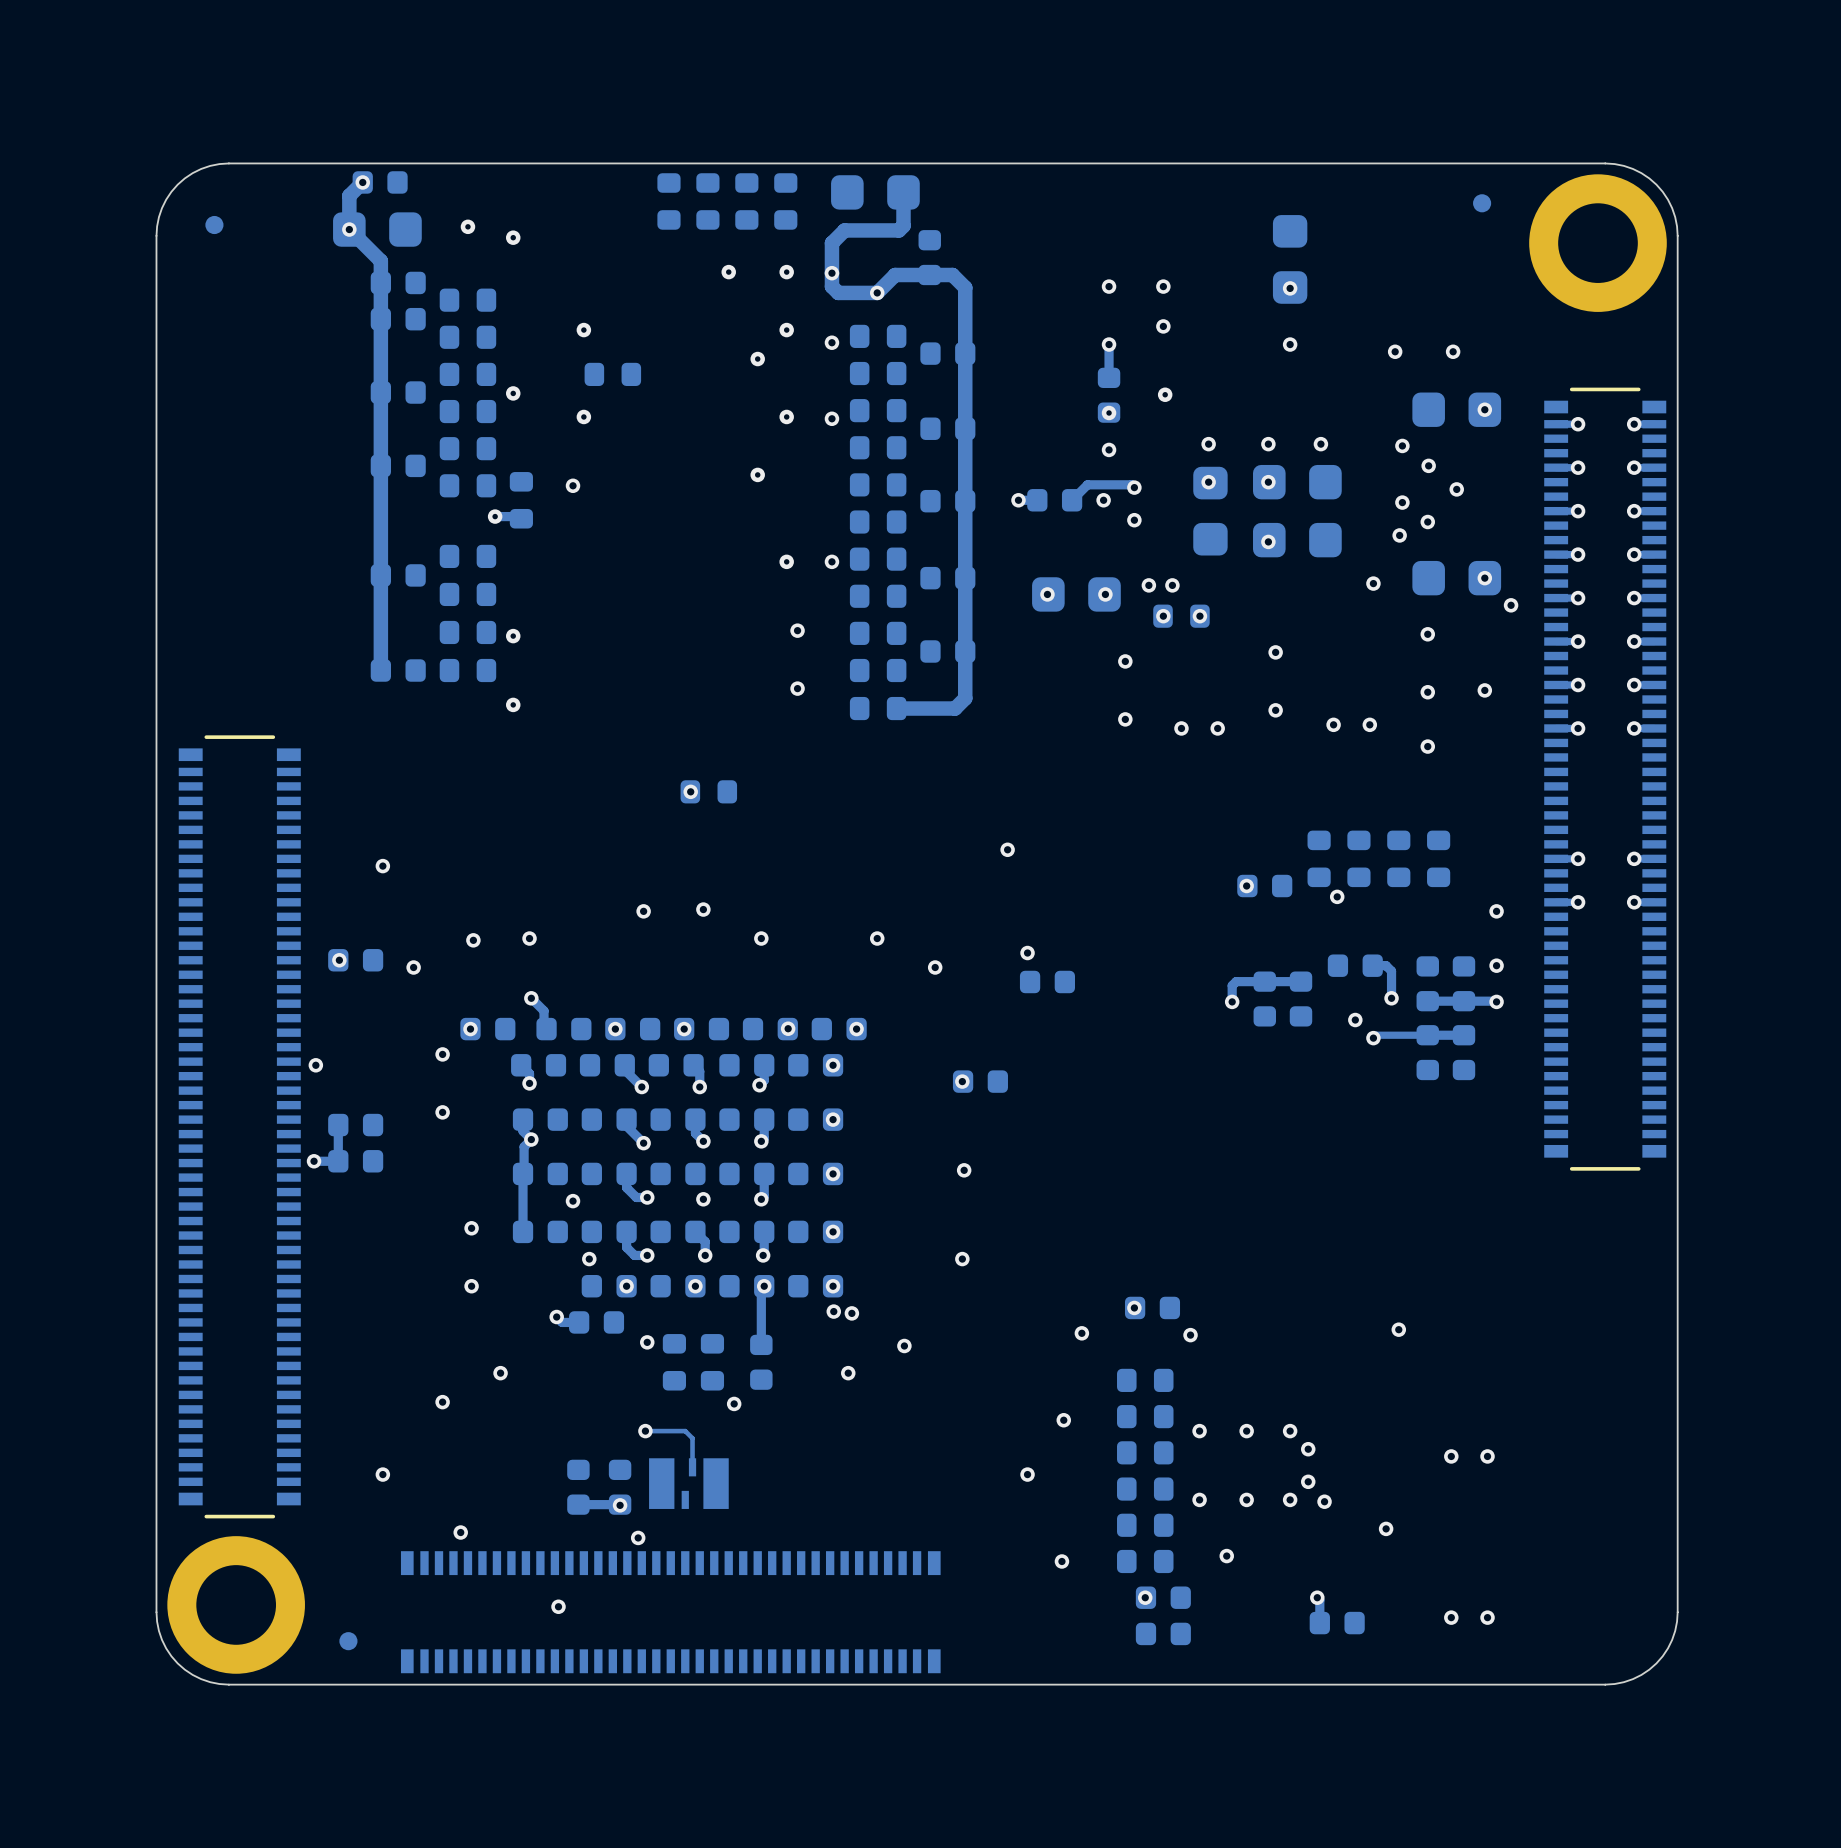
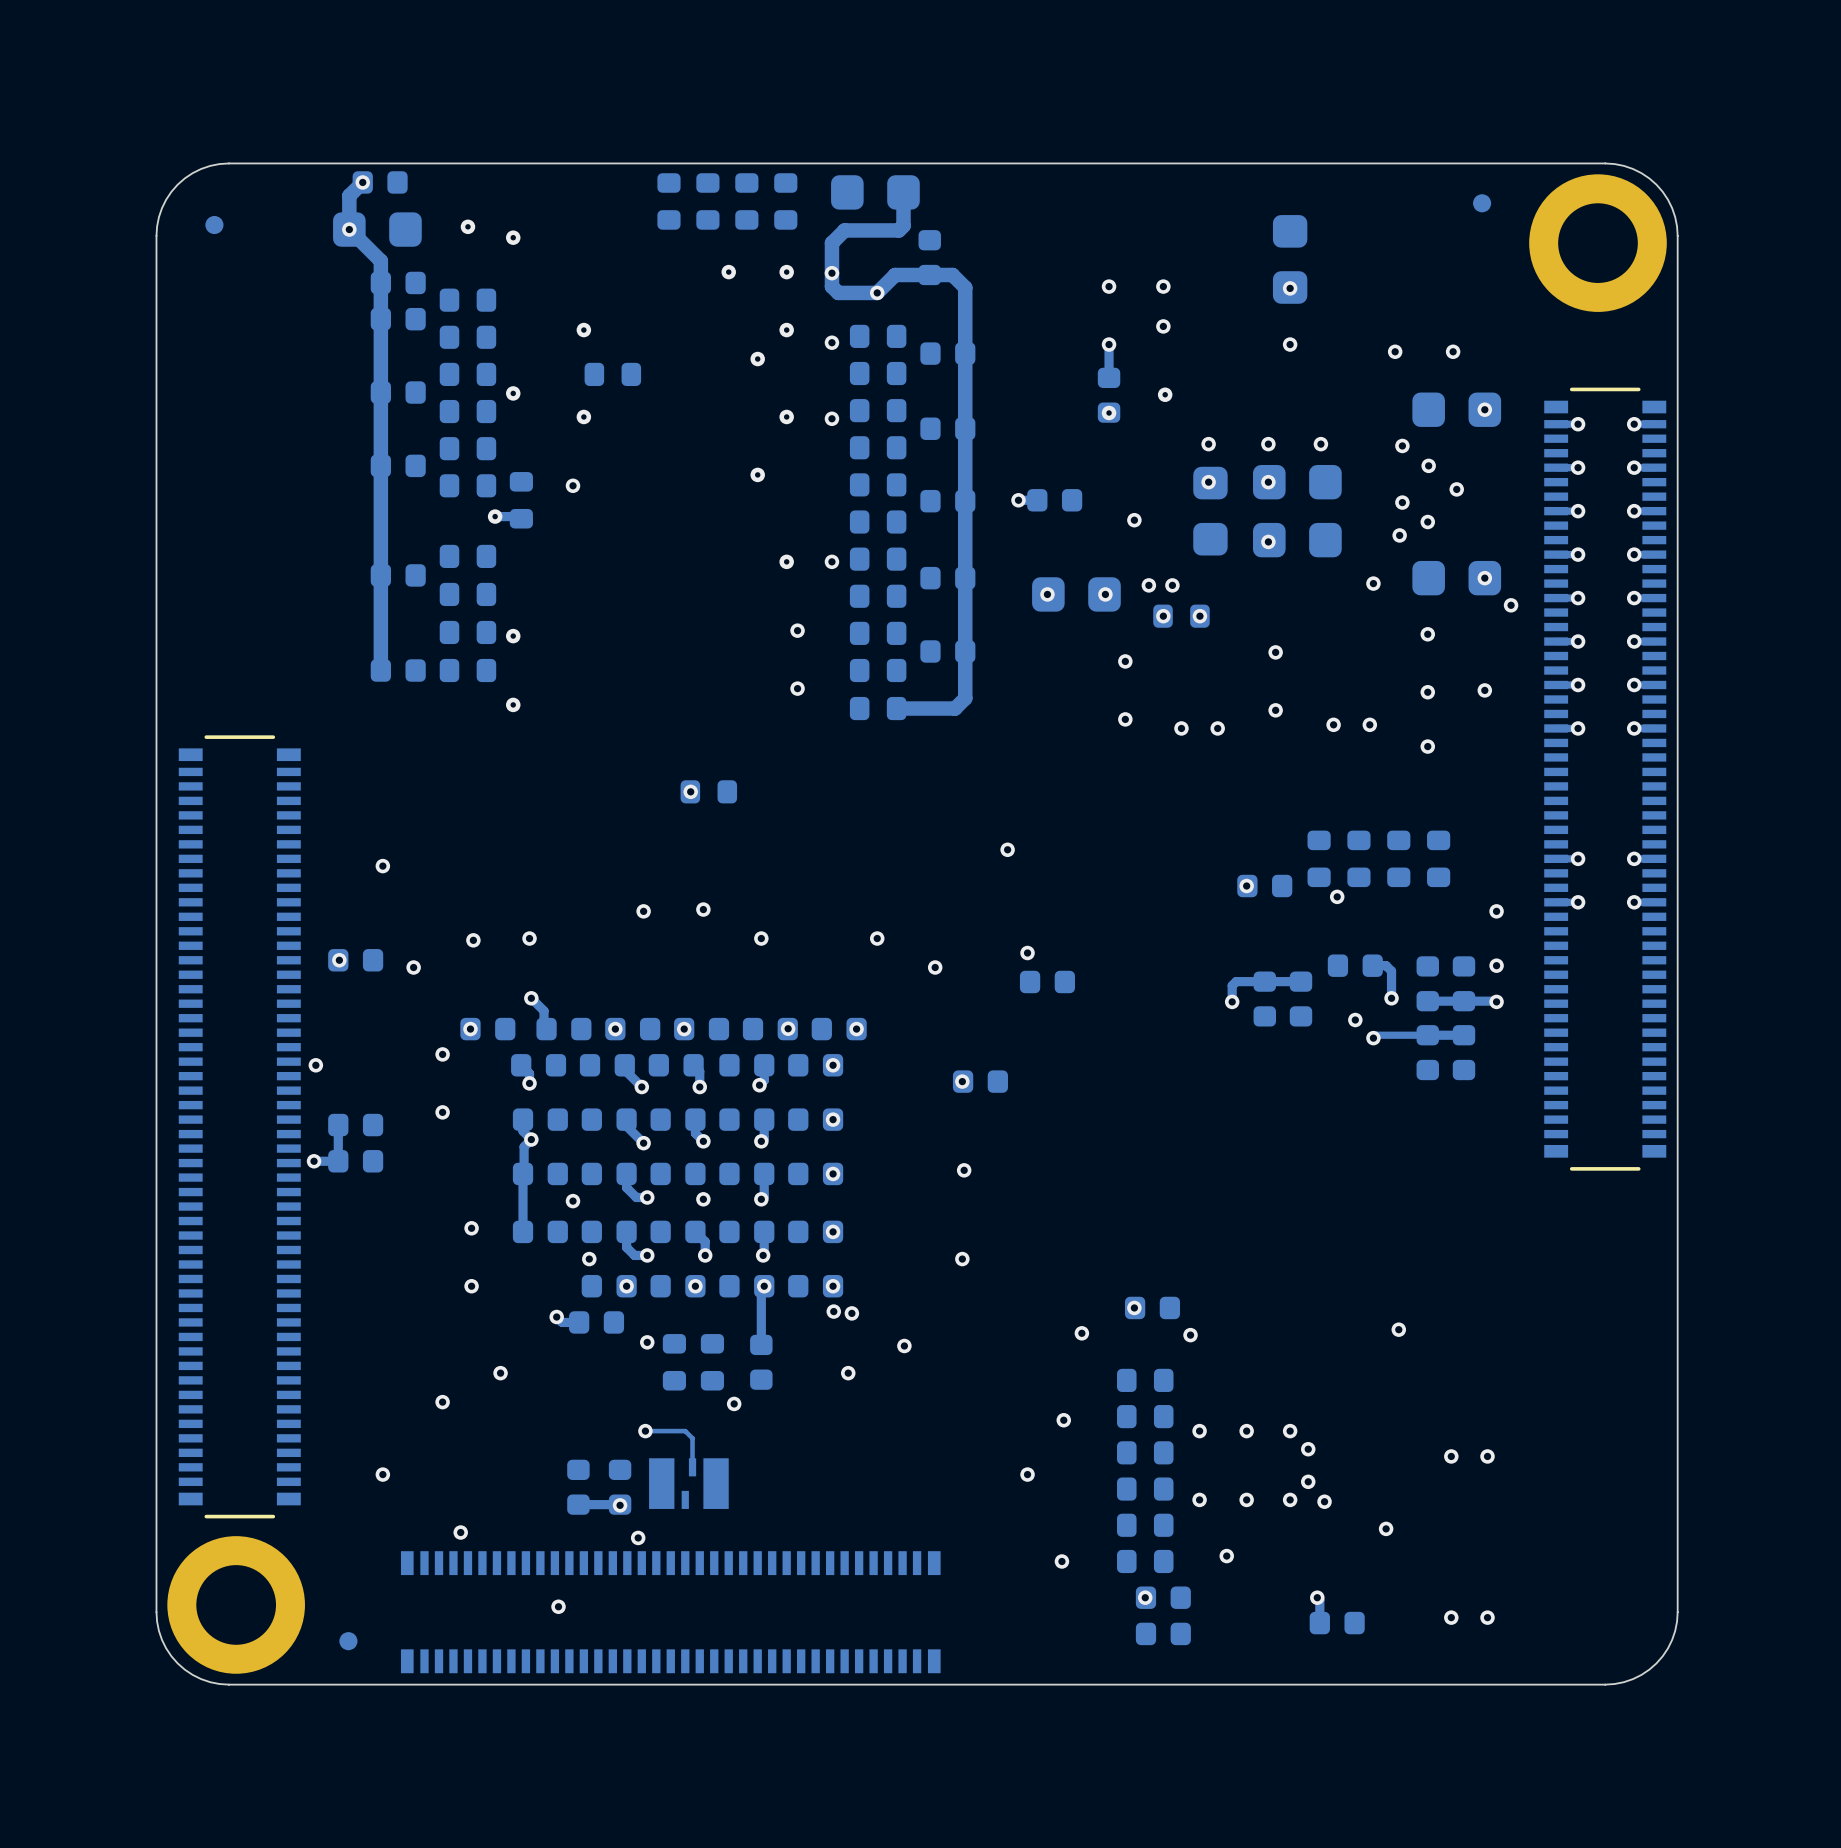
via: (1109, 449) -> none
track: (1134, 487) (1131, 484) (1087, 484) (1072, 500) -> none
via: (1134, 487) -> none
via: (1103, 500) -> none

